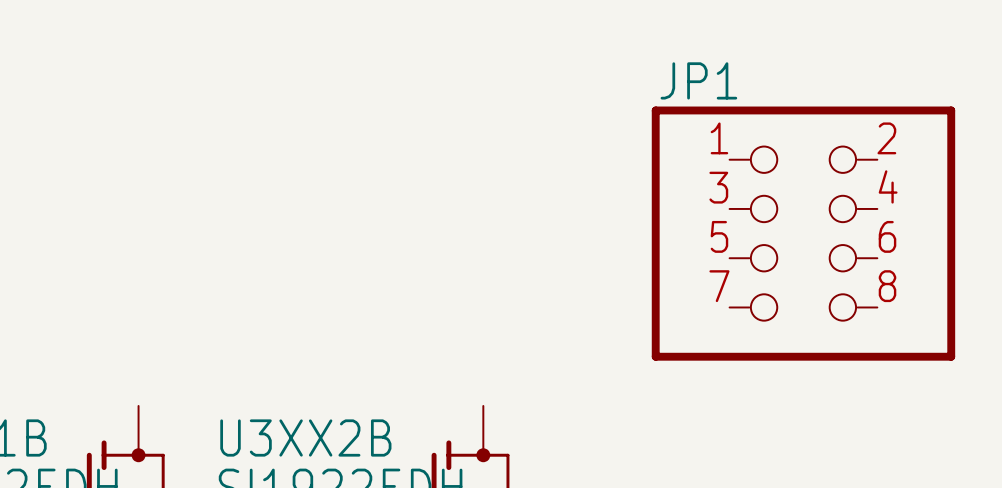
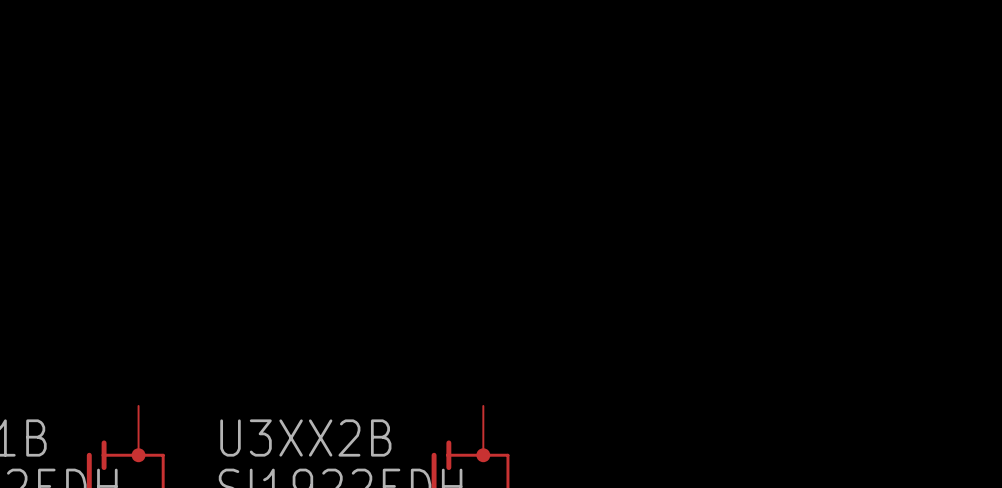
JP1: (803, 233) -> none

